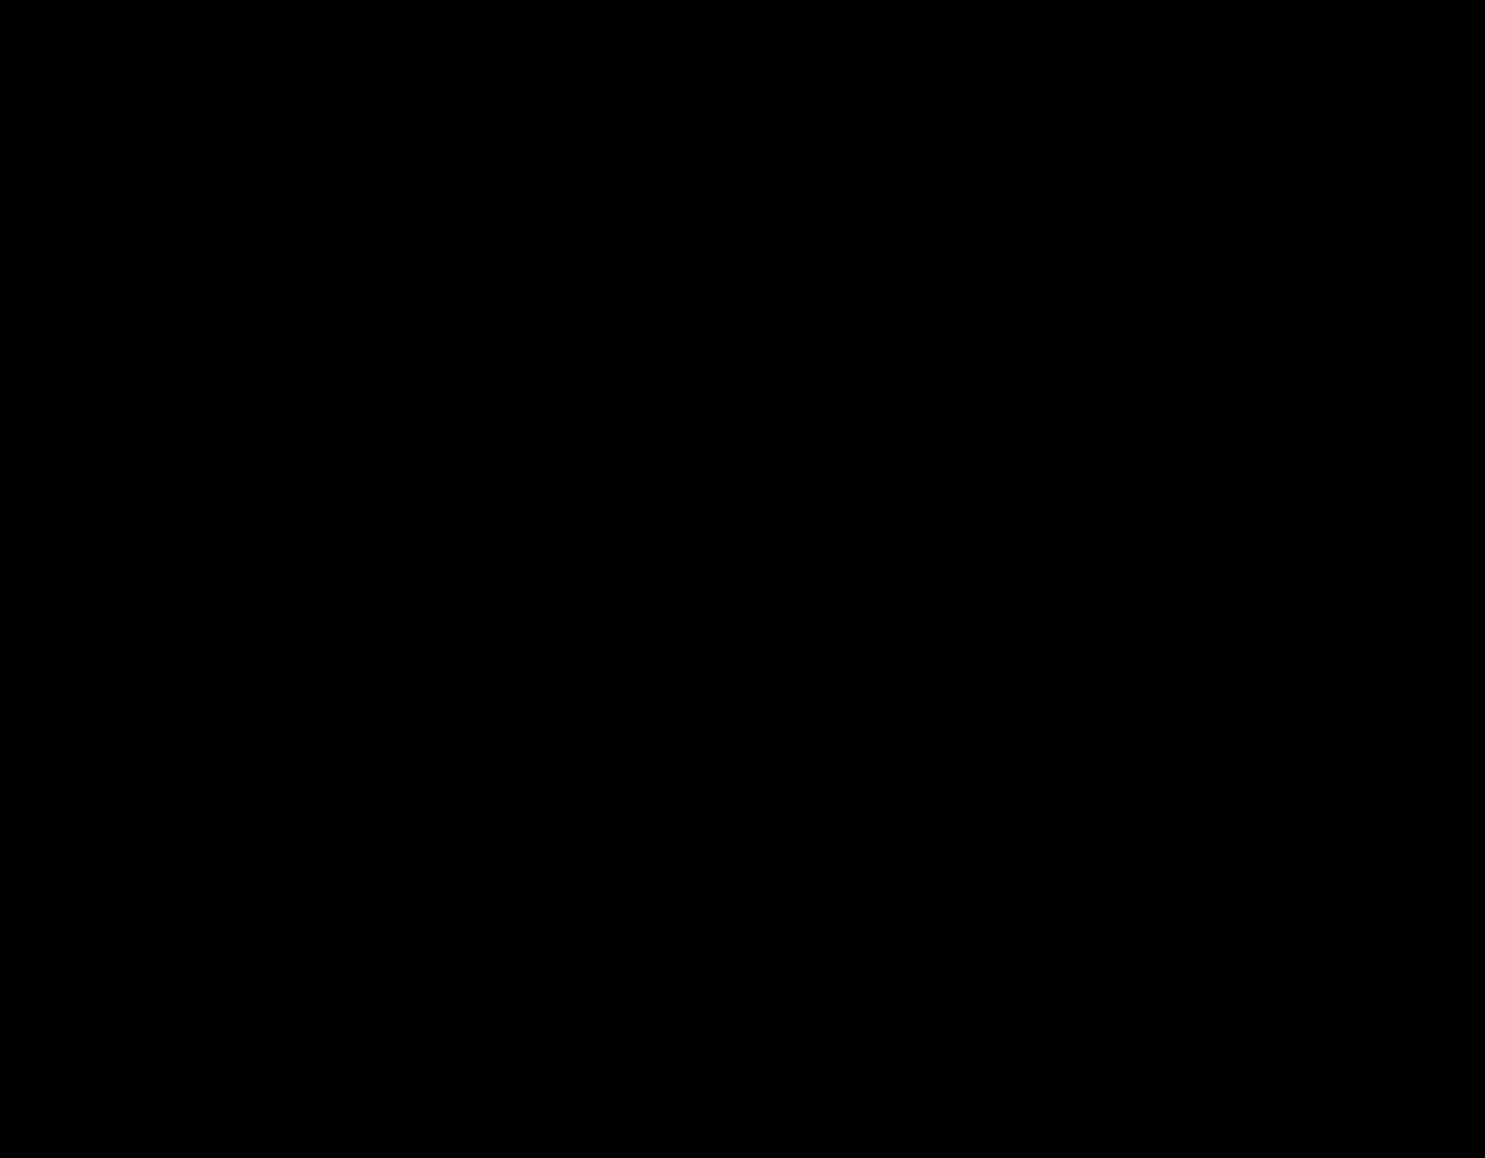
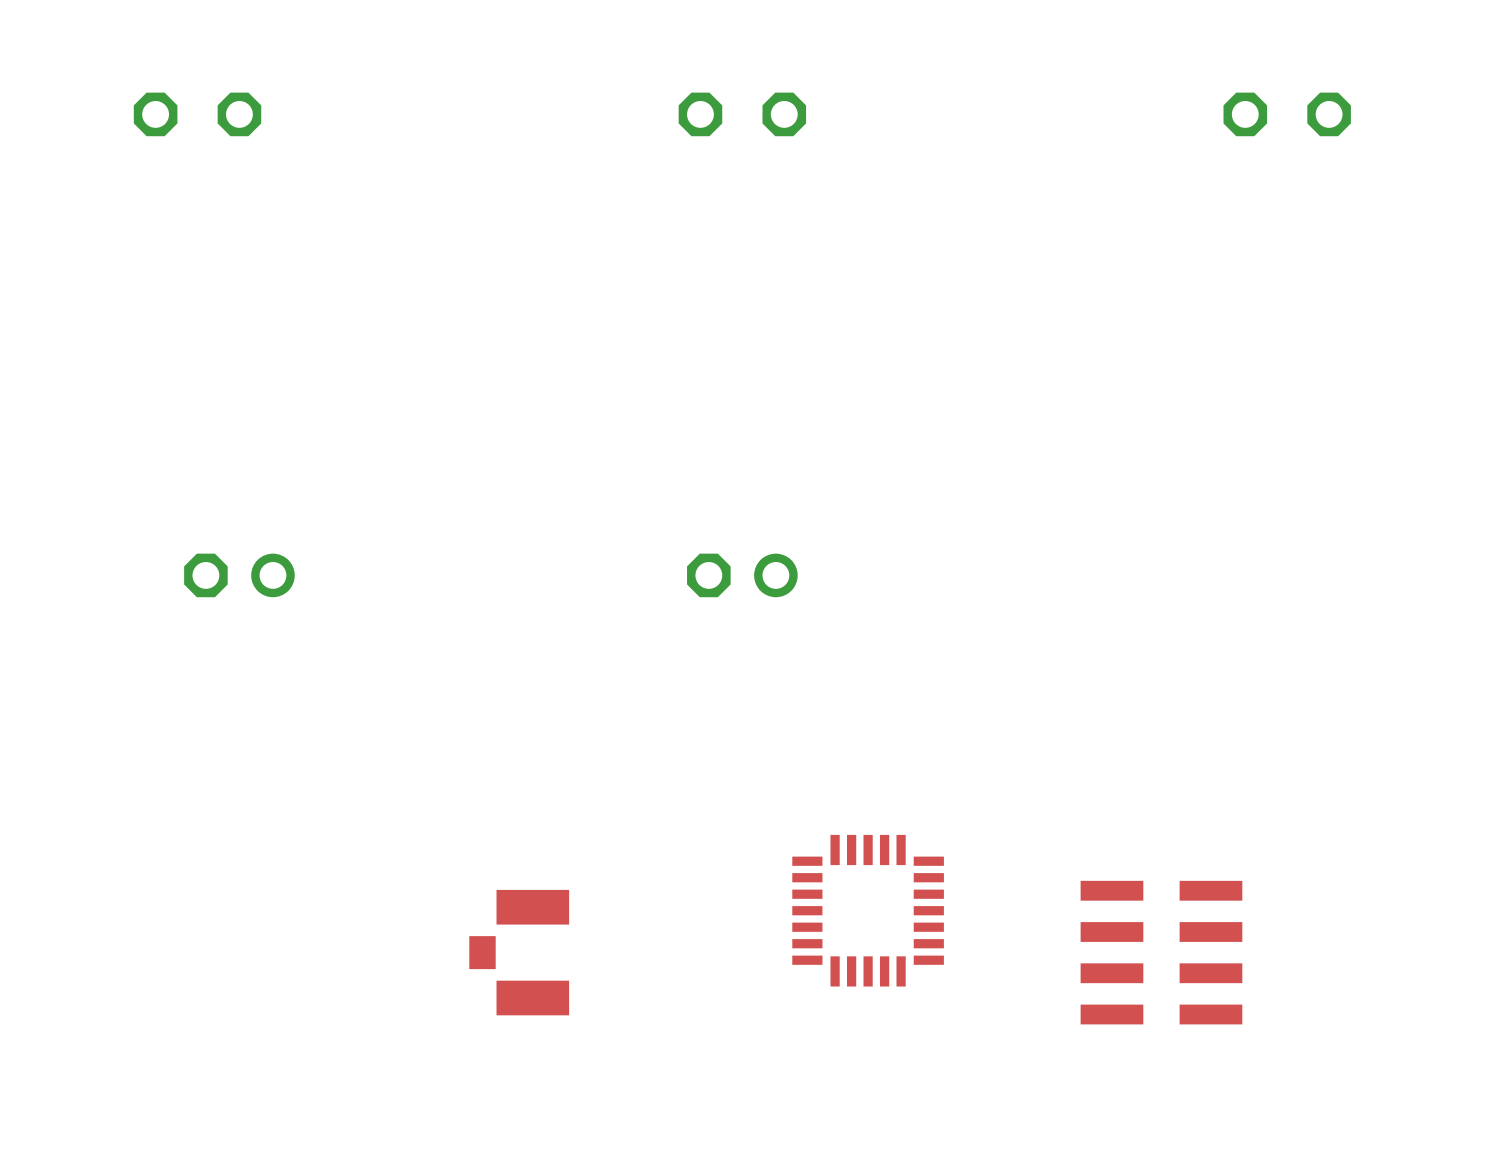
part: none -> (197, 114)
part: none -> (742, 114)
part: none -> (1287, 114)
part: none -> (239, 575)
part: none -> (742, 575)
part: none -> (868, 910)
part: none -> (519, 952)
part: none -> (1161, 952)

